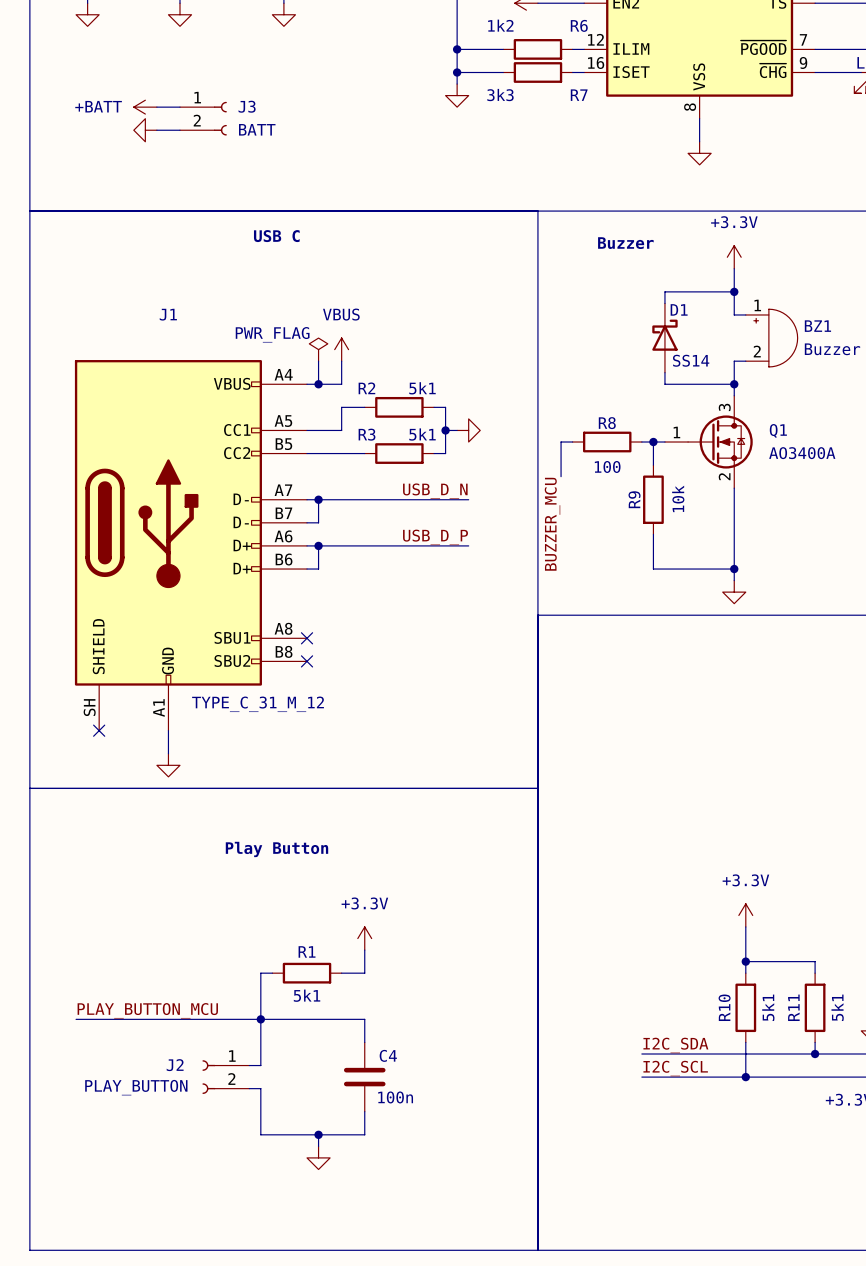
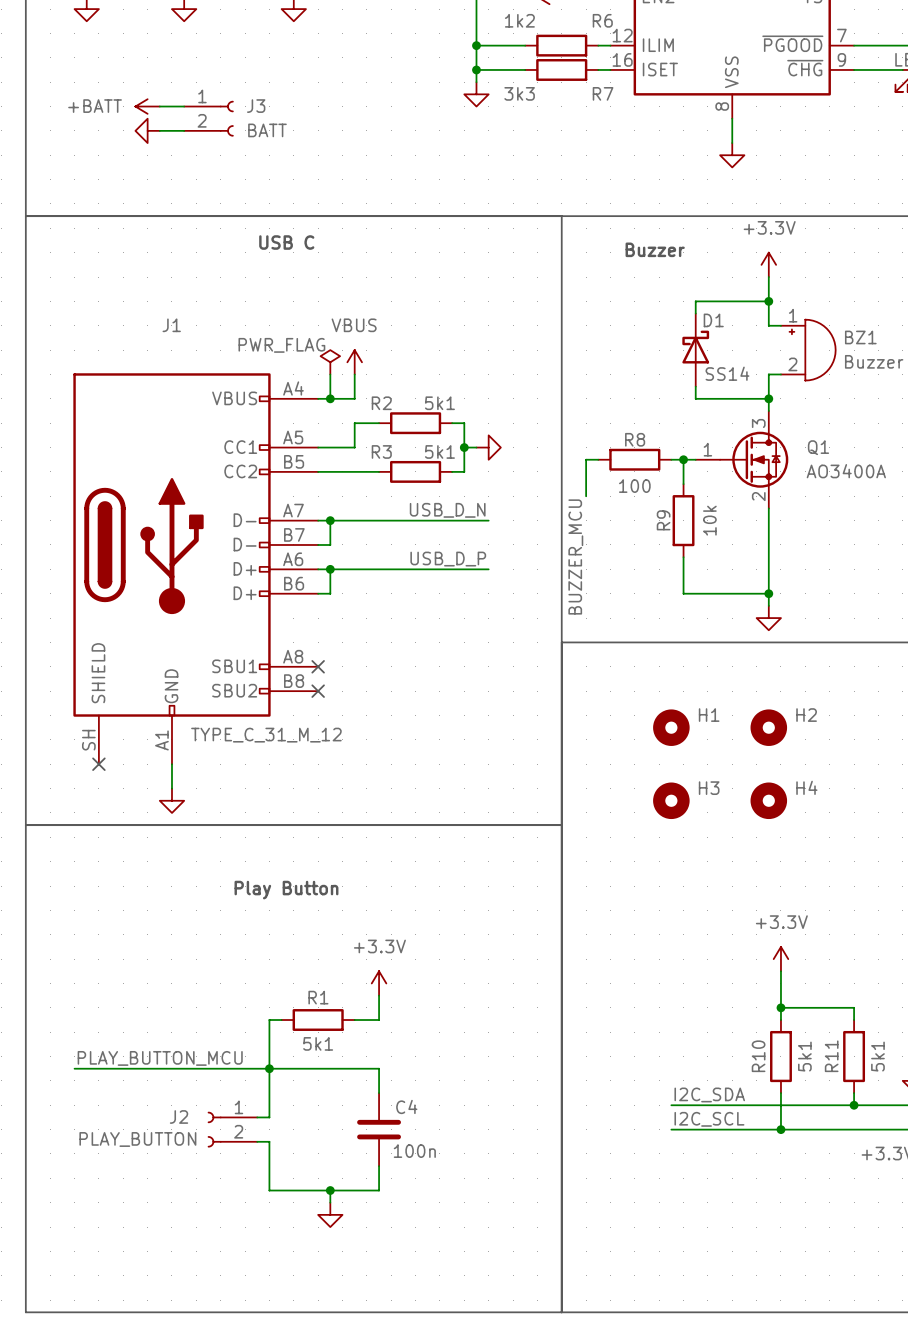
H1: none -> (671, 727)
H2: none -> (768, 727)
H3: none -> (671, 800)
H4: none -> (768, 800)

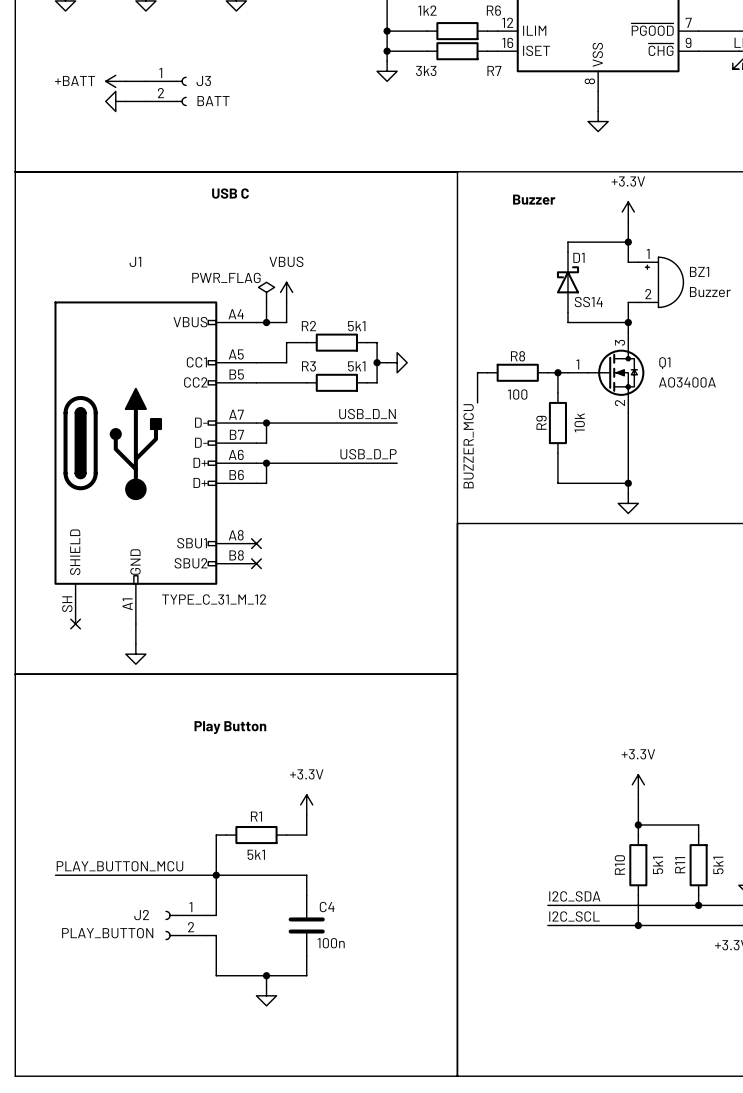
H1: (671, 727) -> none
H2: (768, 727) -> none
H3: (671, 800) -> none
H4: (768, 800) -> none

